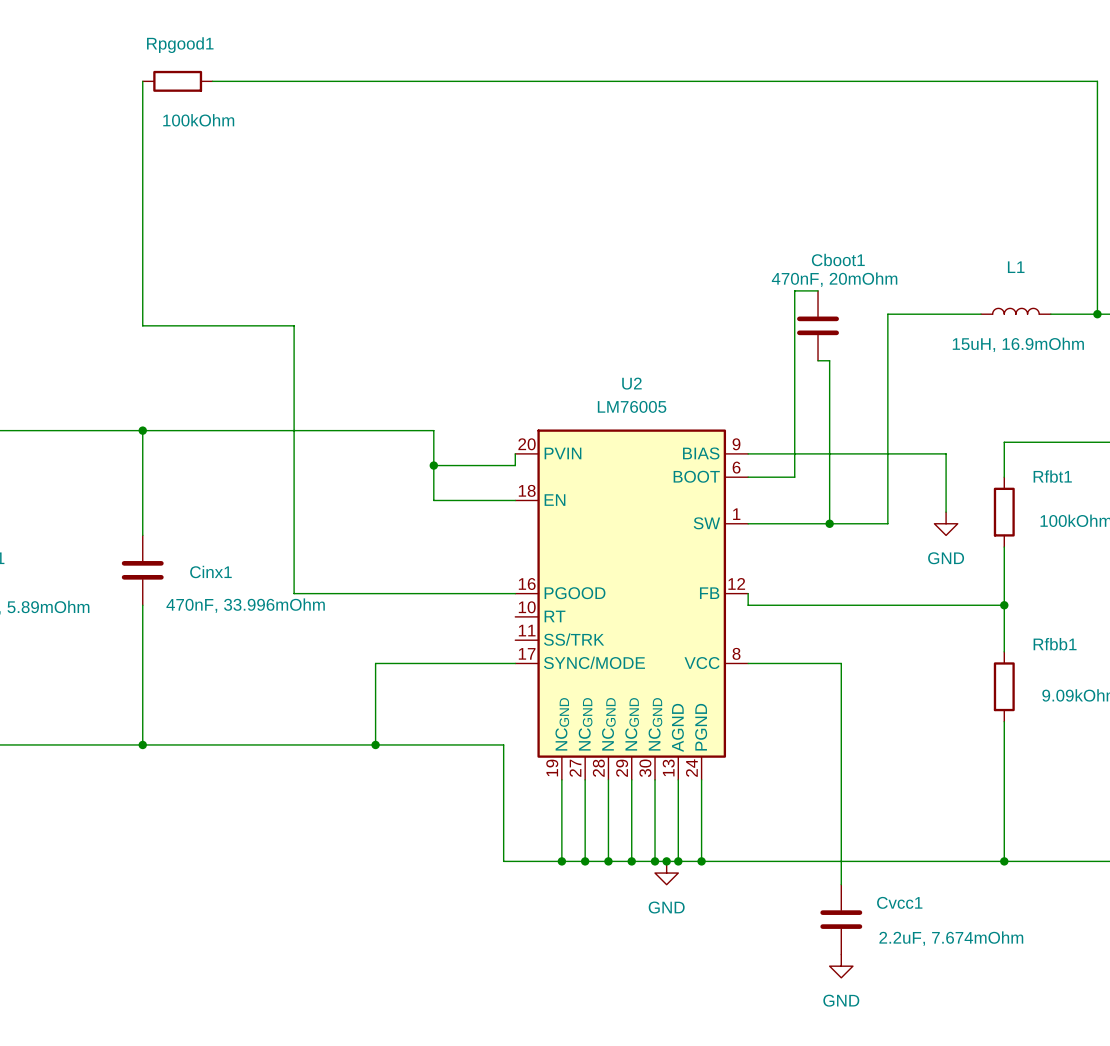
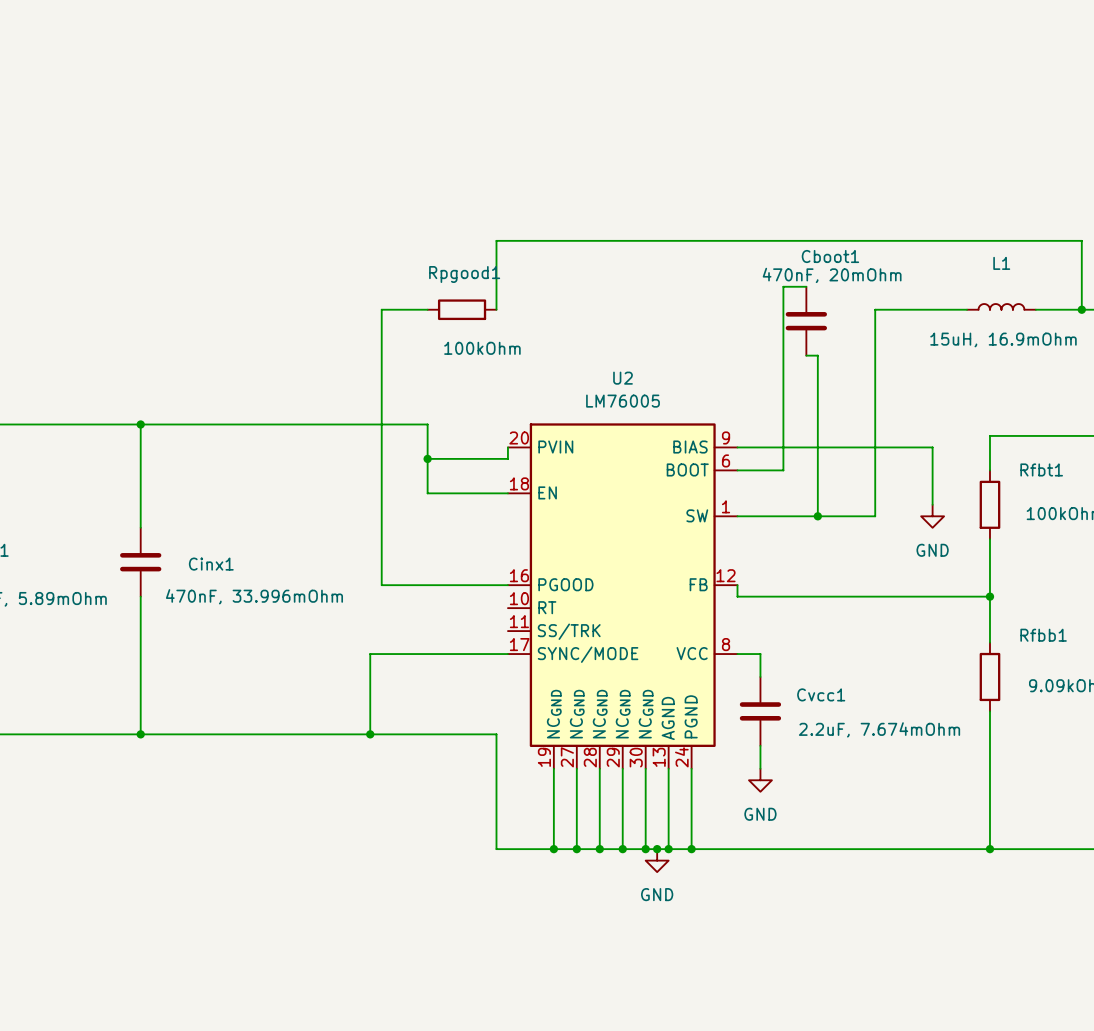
wire: (142, 81) (142, 325) (294, 325) (294, 593) (387, 593) -> (427, 309) (381, 309) (381, 585)
Rpgood1 position: (177, 81) -> (462, 309)
wire: (212, 81) (1097, 81) (1097, 244) -> (496, 309) (496, 240) (1081, 240)
wire: (771, 663) (841, 663) (841, 884) -> (760, 654) (760, 676)
wire: none -> (760, 745) (760, 768)
Cvcc1 position: (841, 919) -> (760, 711)
power symbol position: GND (841, 966) -> GND (760, 780)

